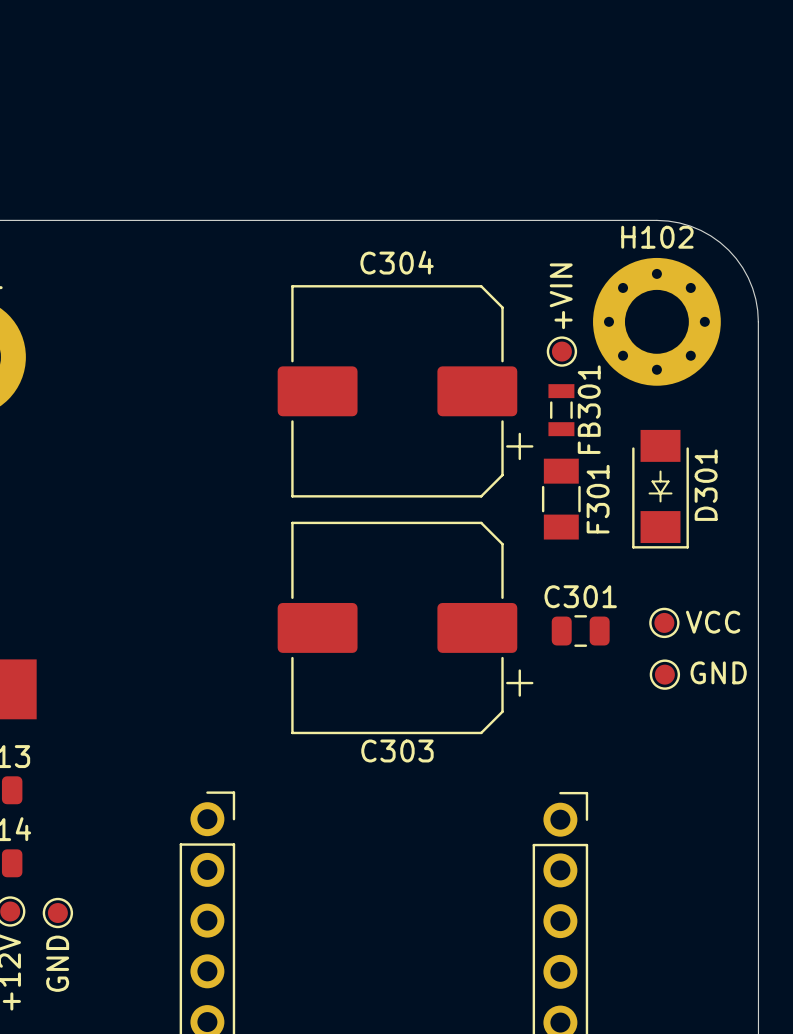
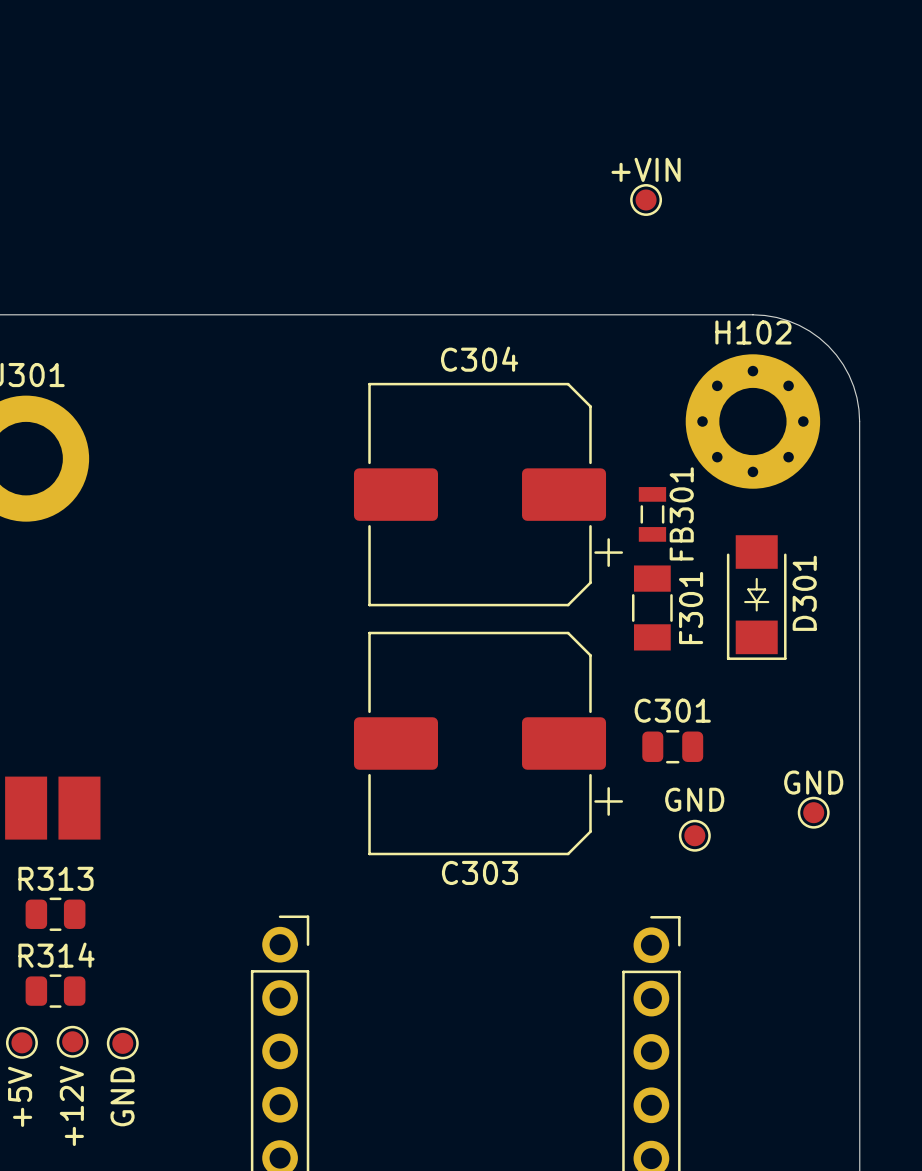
part value rotation: 0° (561, 296) -> 90° clockwise (646, 169)
part position: (561, 351) -> (646, 199)
part: VCC (664, 622) -> none
part: GND (664, 674) -> none
part: none -> GND (813, 812)
part: none -> GND (694, 835)

